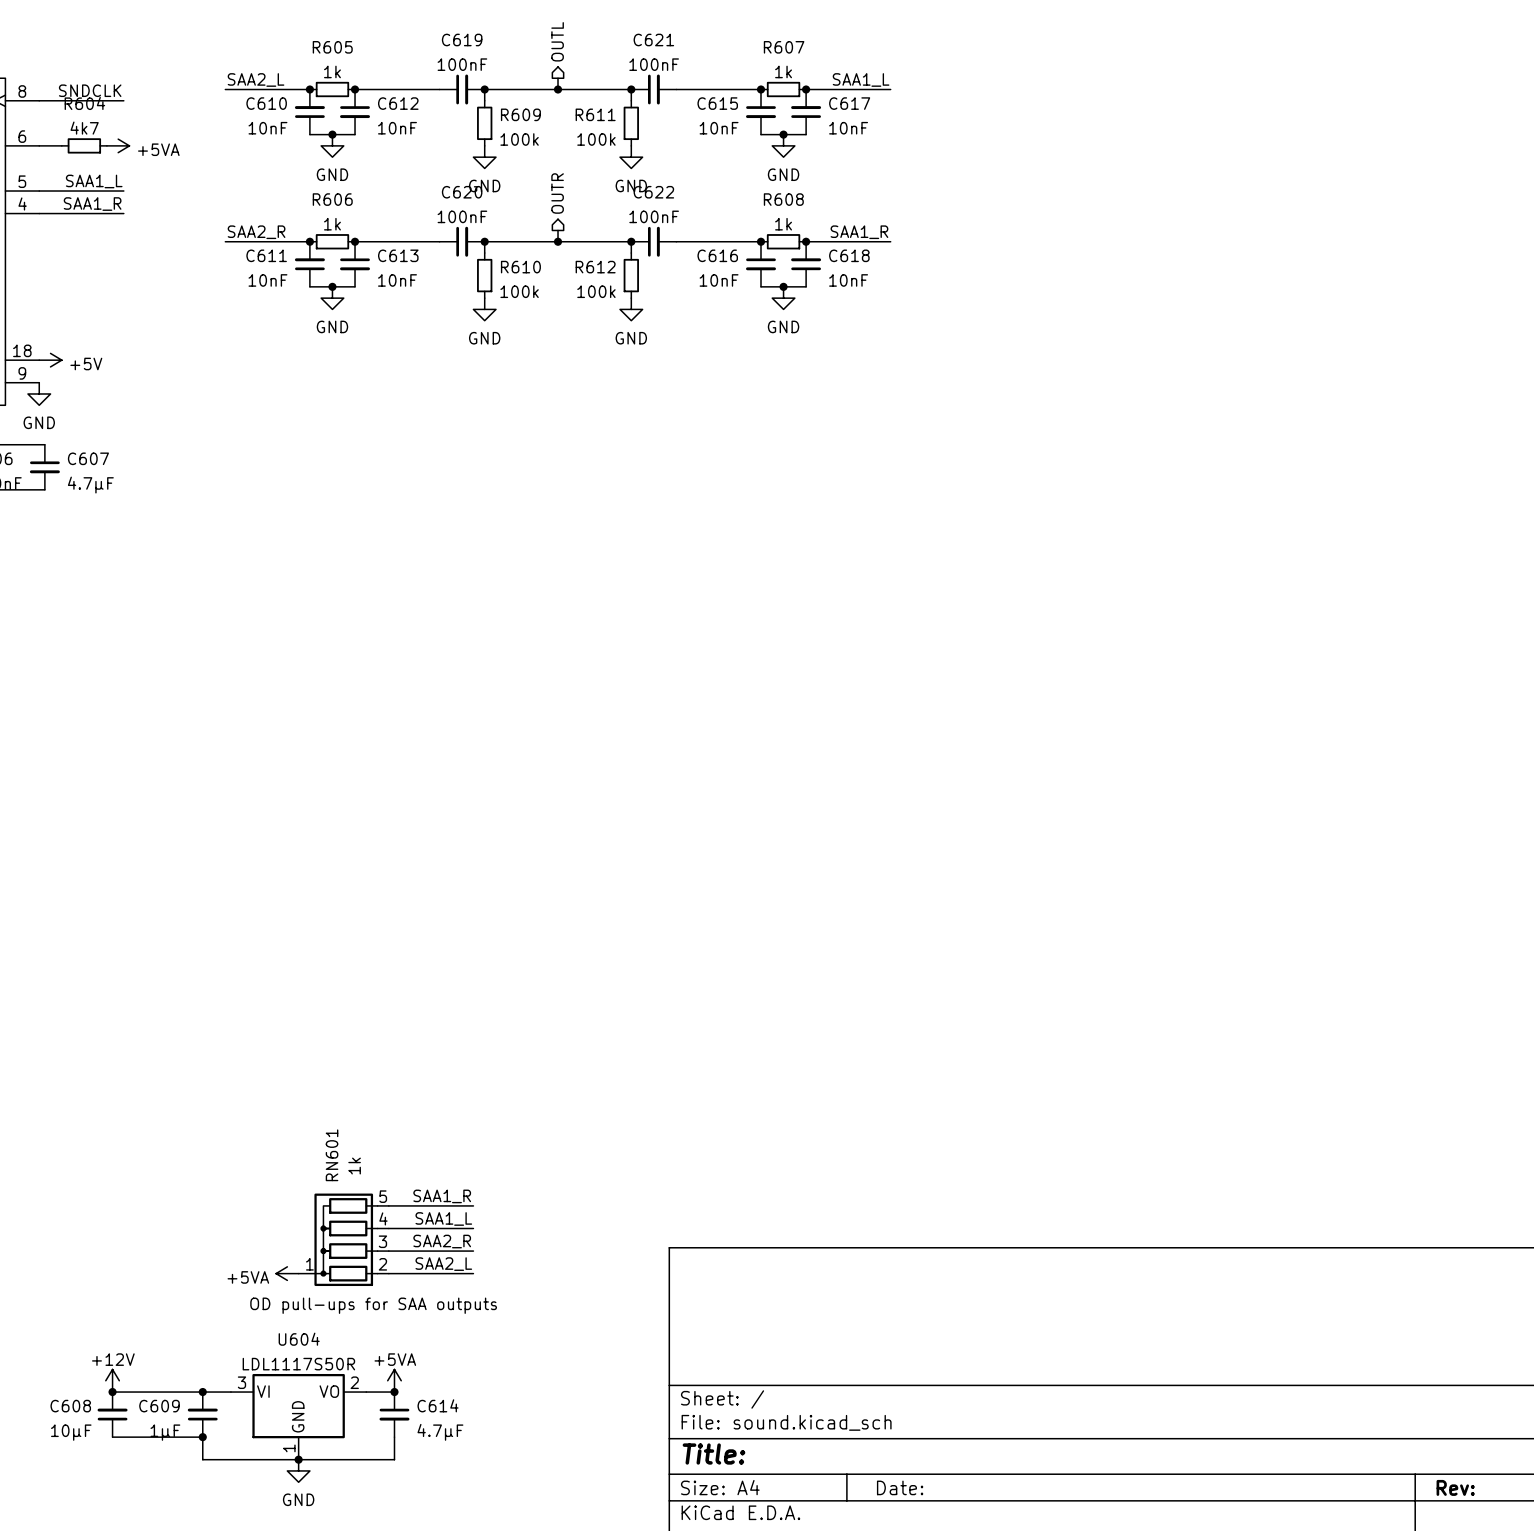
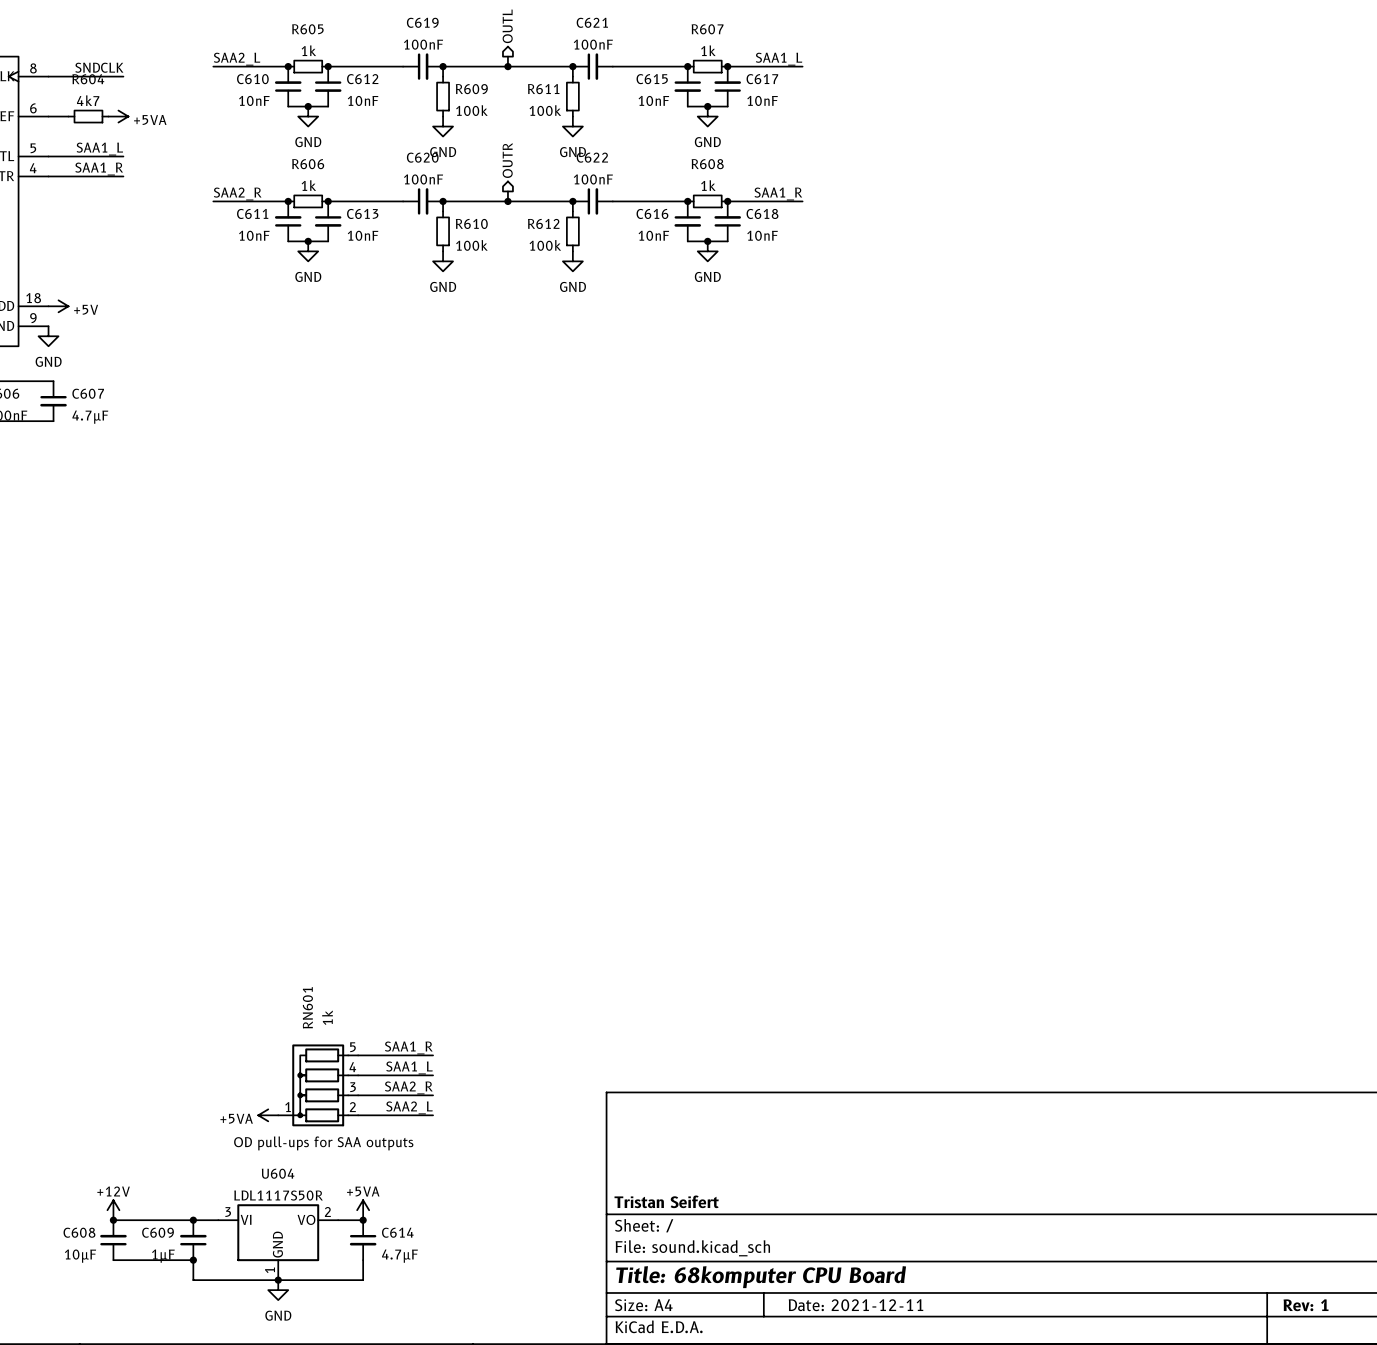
title block: none -> Tristan Seifert (666, 1201)
title block: Title: (713, 1454) -> Title: 68komputer CPU Board (761, 1277)
title block: Date: (900, 1487) -> Date: 2021-12-11 (856, 1305)
title block: Rev: (1455, 1487) -> Rev: 1 (1306, 1305)

